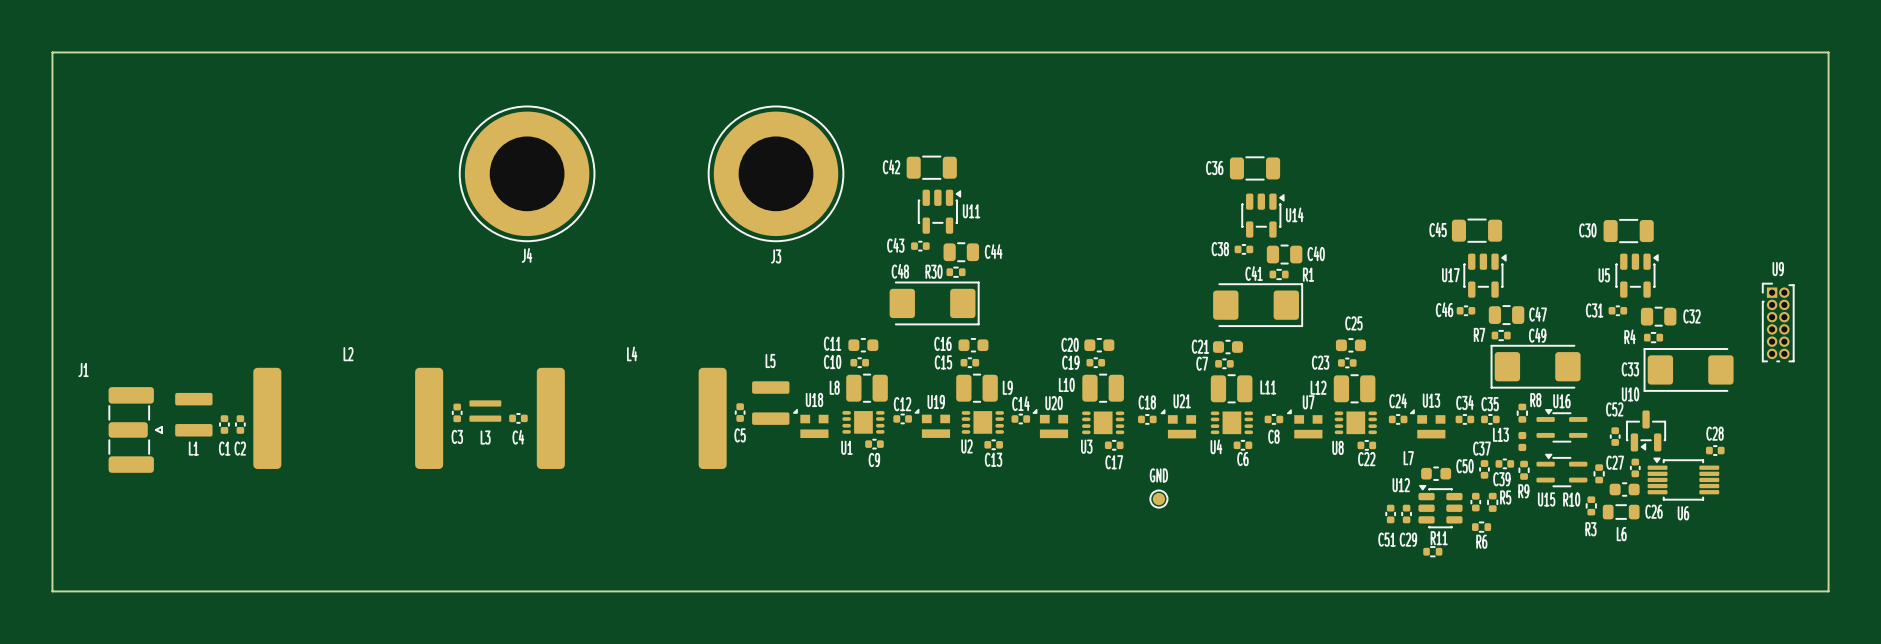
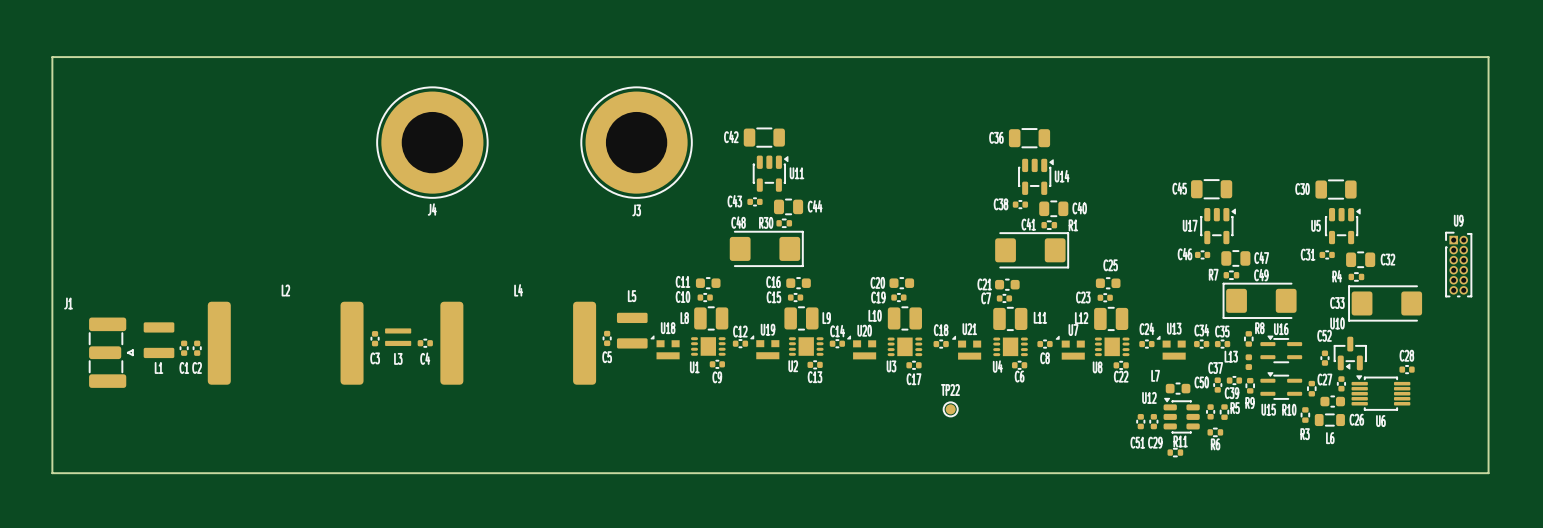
board edge: (52, 52) (1828, 52) (1828, 591) (52, 591) (52, 52) -> (52, 57) (52, 473) (1488, 473) (1488, 57) (52, 57)
GND name: GND (1158, 475) -> TP22 (950, 390)

